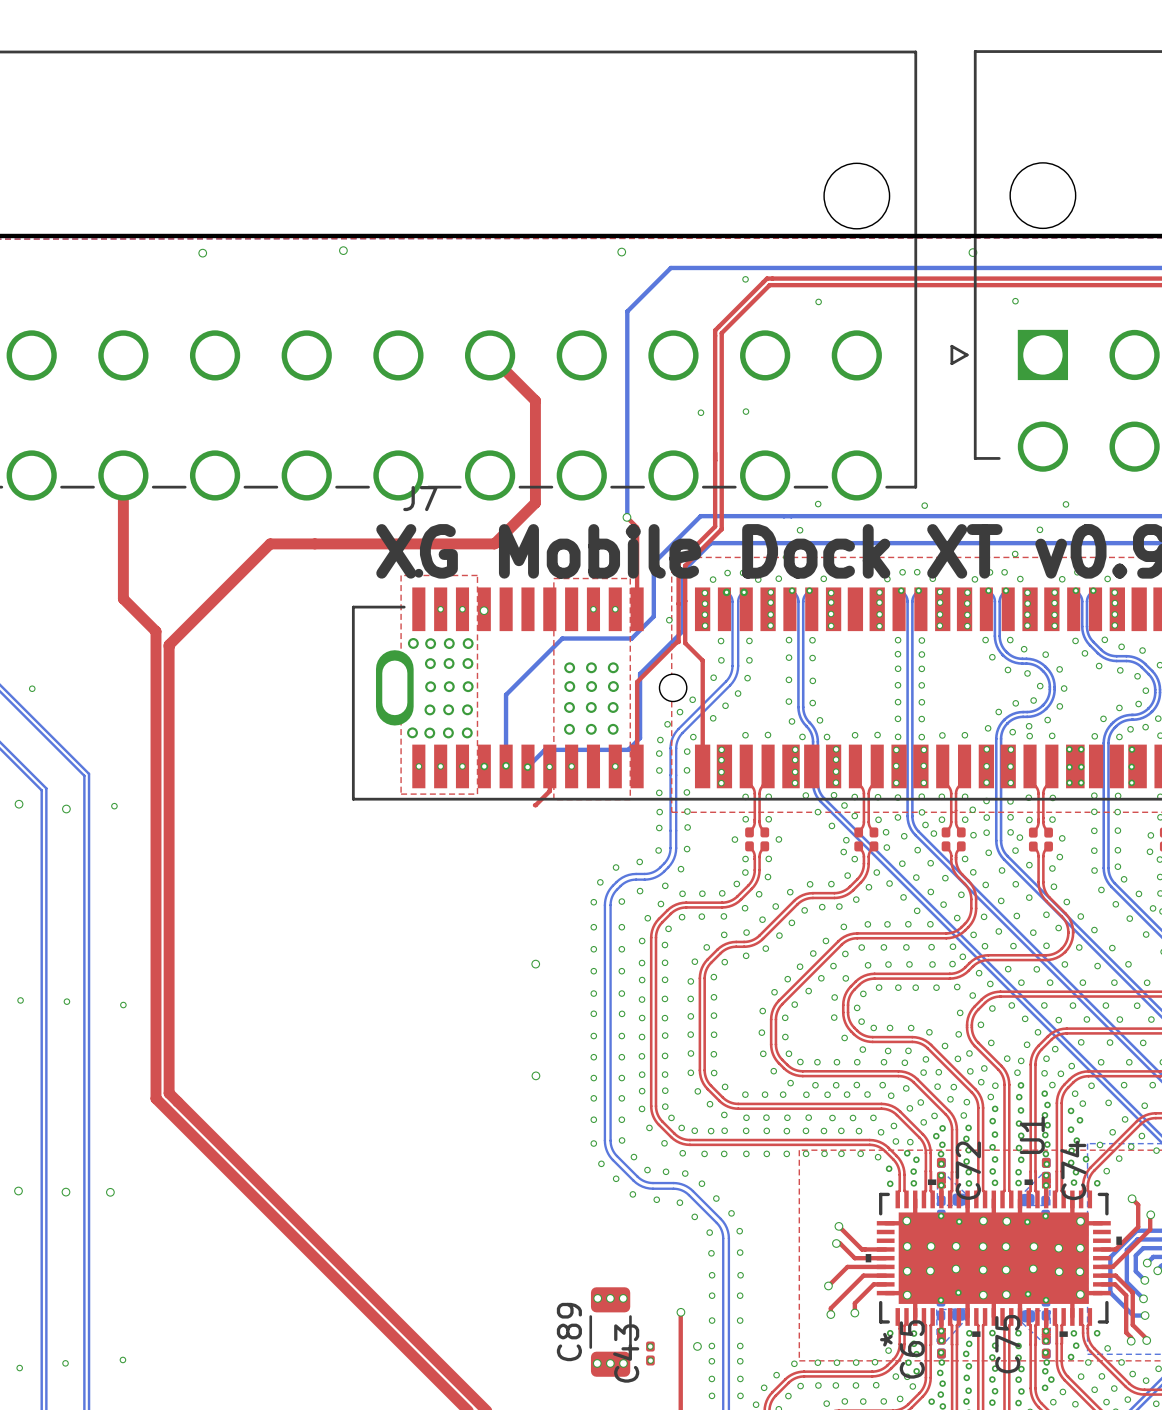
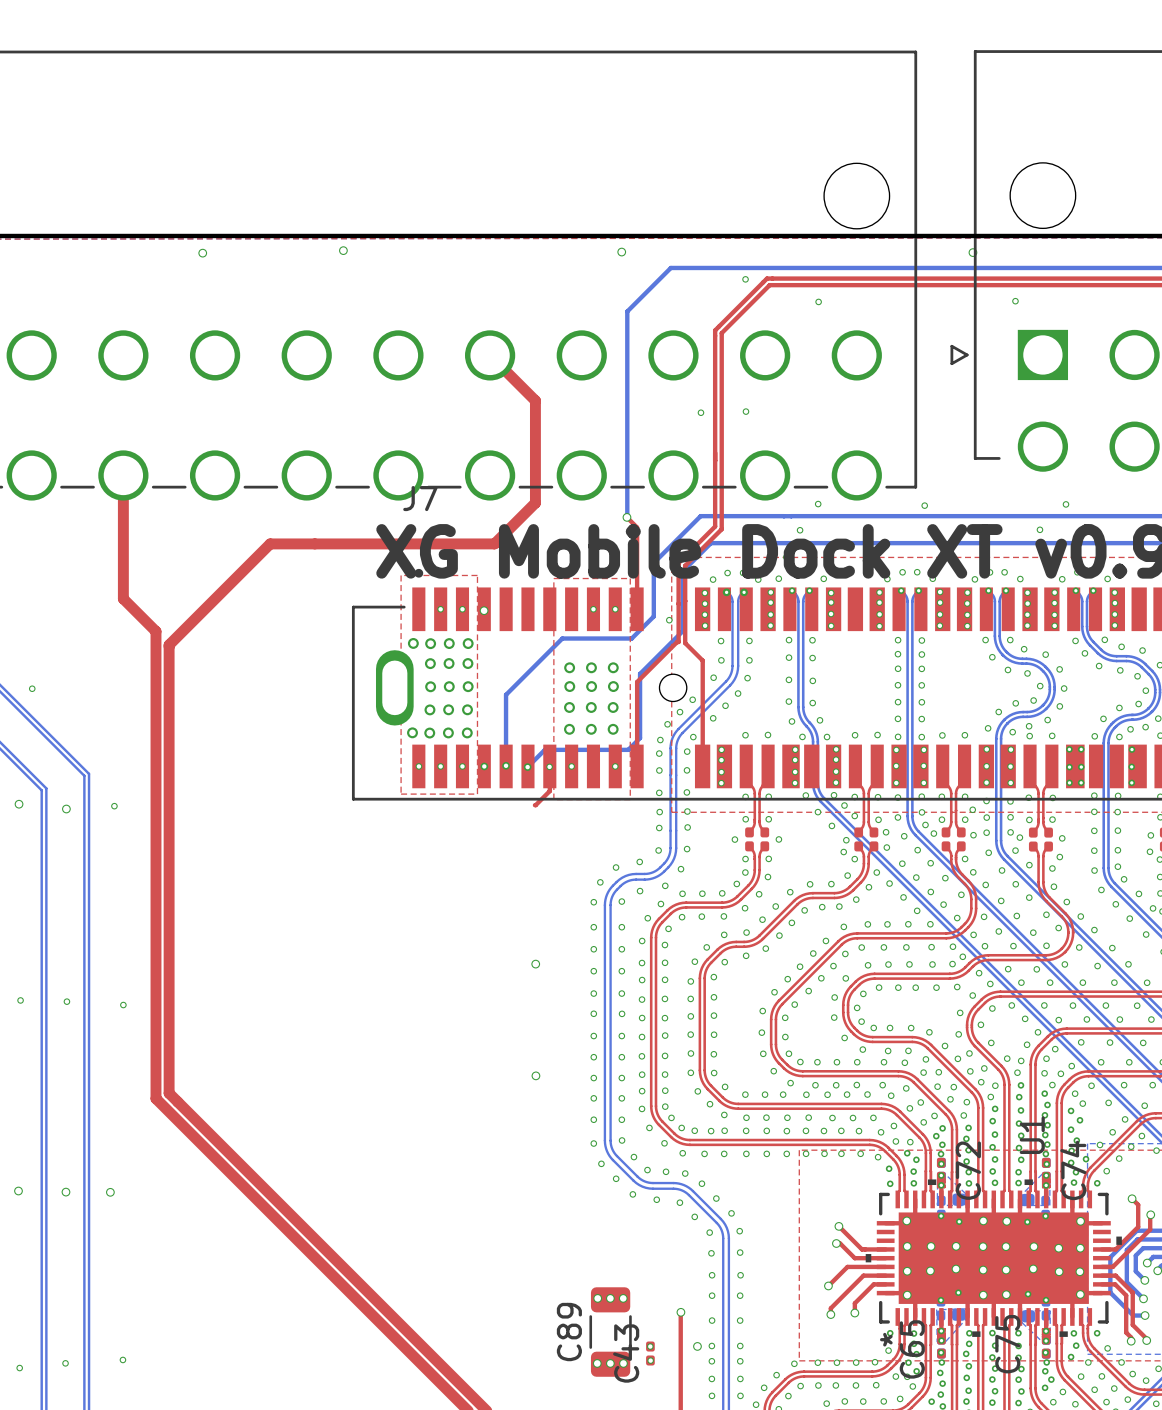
via: (1015, 554) -> none

